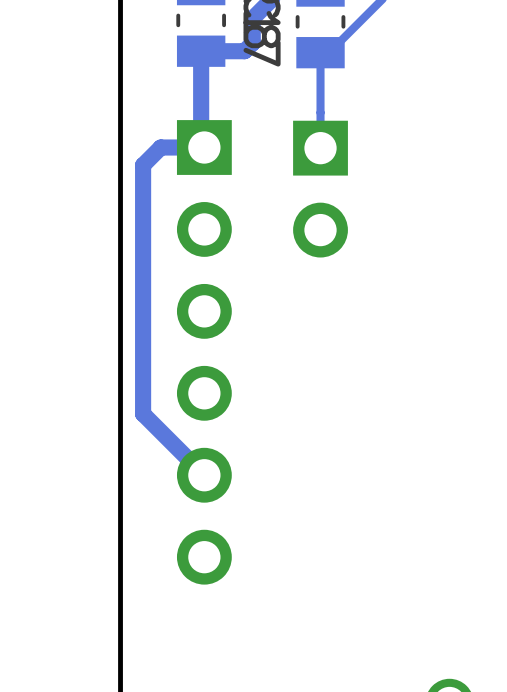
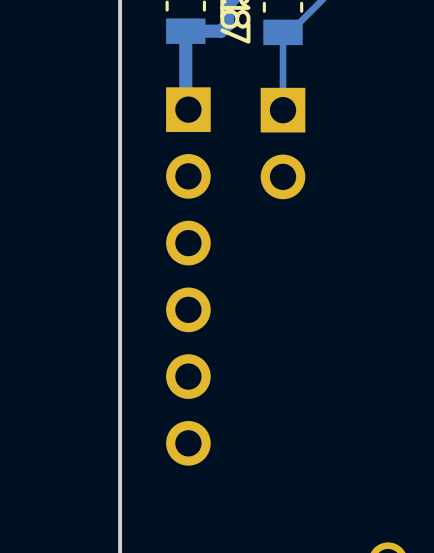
track: (204, 147) (160, 147) (143, 165) (143, 413) (204, 475) -> none

